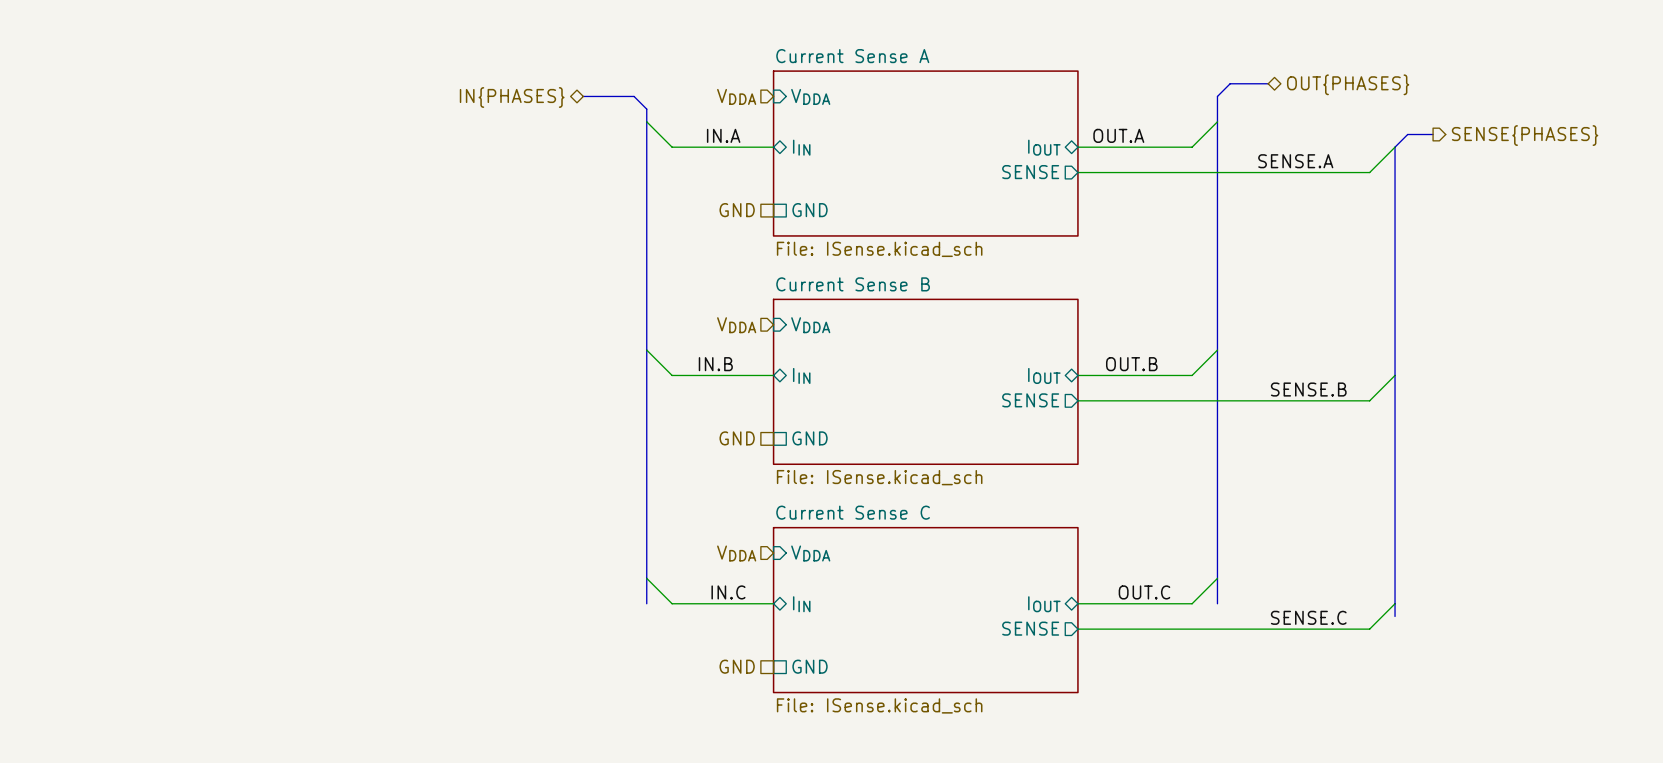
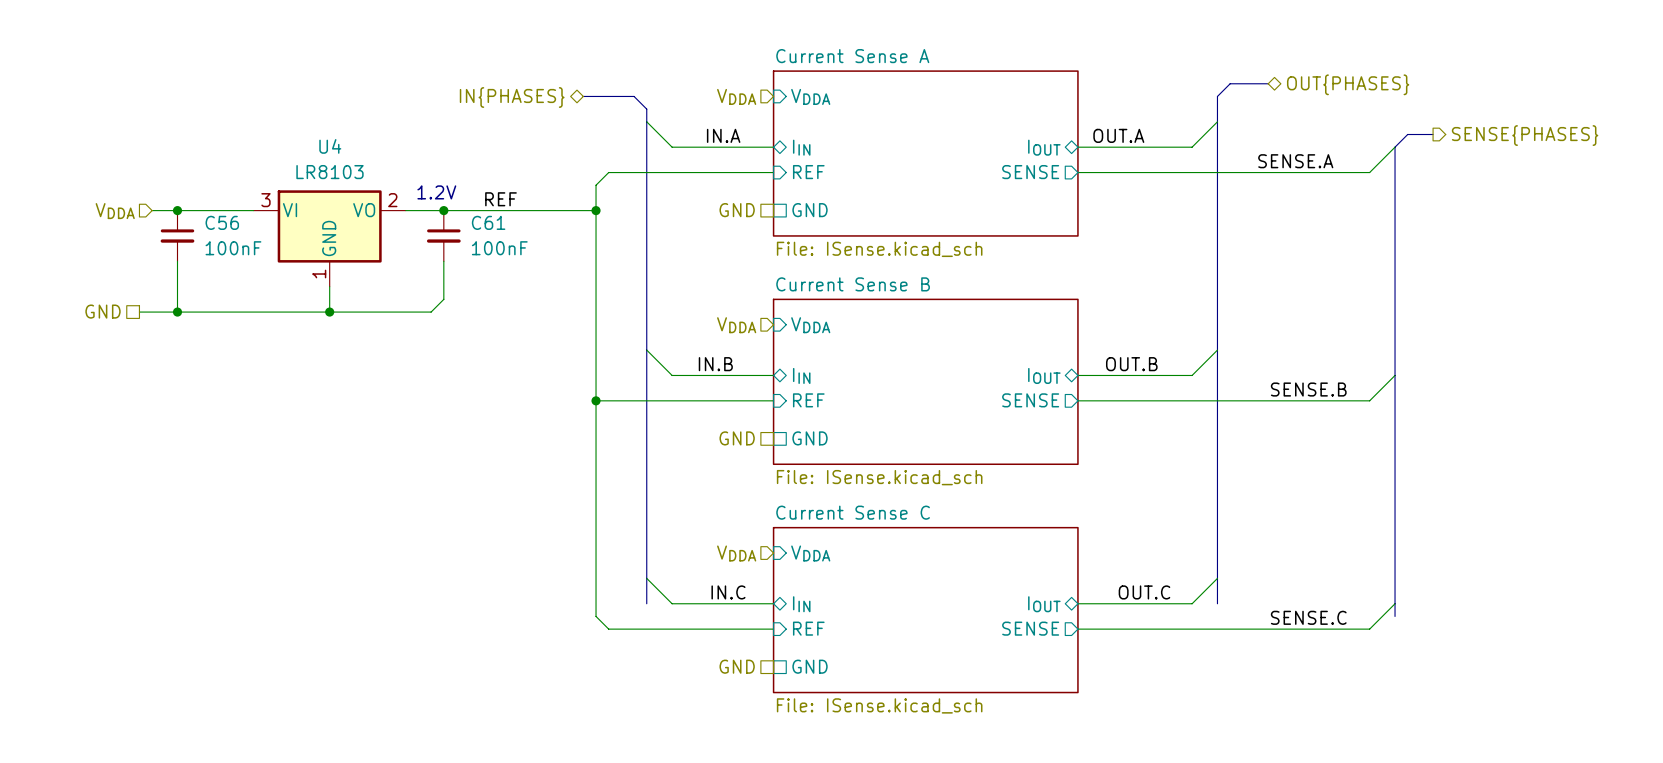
wire: none -> (773, 172) (608, 172) (596, 185) (596, 616) (608, 629) (773, 629)
sheet pin: none -> REF (808, 172)
text: none -> 1.2V (436, 192)
label: none -> REF (500, 199)
wire: none -> (152, 210) (253, 210)
junction: none -> (177, 210)
wire: none -> (405, 210) (596, 210)
junction: none -> (443, 210)
junction: none -> (596, 210)
hierarchical label: none -> VDDA (115, 211)
C56: none -> 100nF (177, 235)
C61: none -> 100nF (443, 235)
U4: none -> LR8103 (329, 238)
wire: none -> (177, 261) (177, 312)
wire: none -> (443, 261) (443, 299) (431, 312) (139, 312)
wire: none -> (329, 286) (329, 312)
hierarchical label: none -> GND (103, 311)
junction: none -> (177, 312)
junction: none -> (329, 312)
wire: none -> (596, 400) (773, 400)
junction: none -> (596, 400)
sheet pin: none -> REF (808, 400)
sheet pin: none -> REF (808, 628)

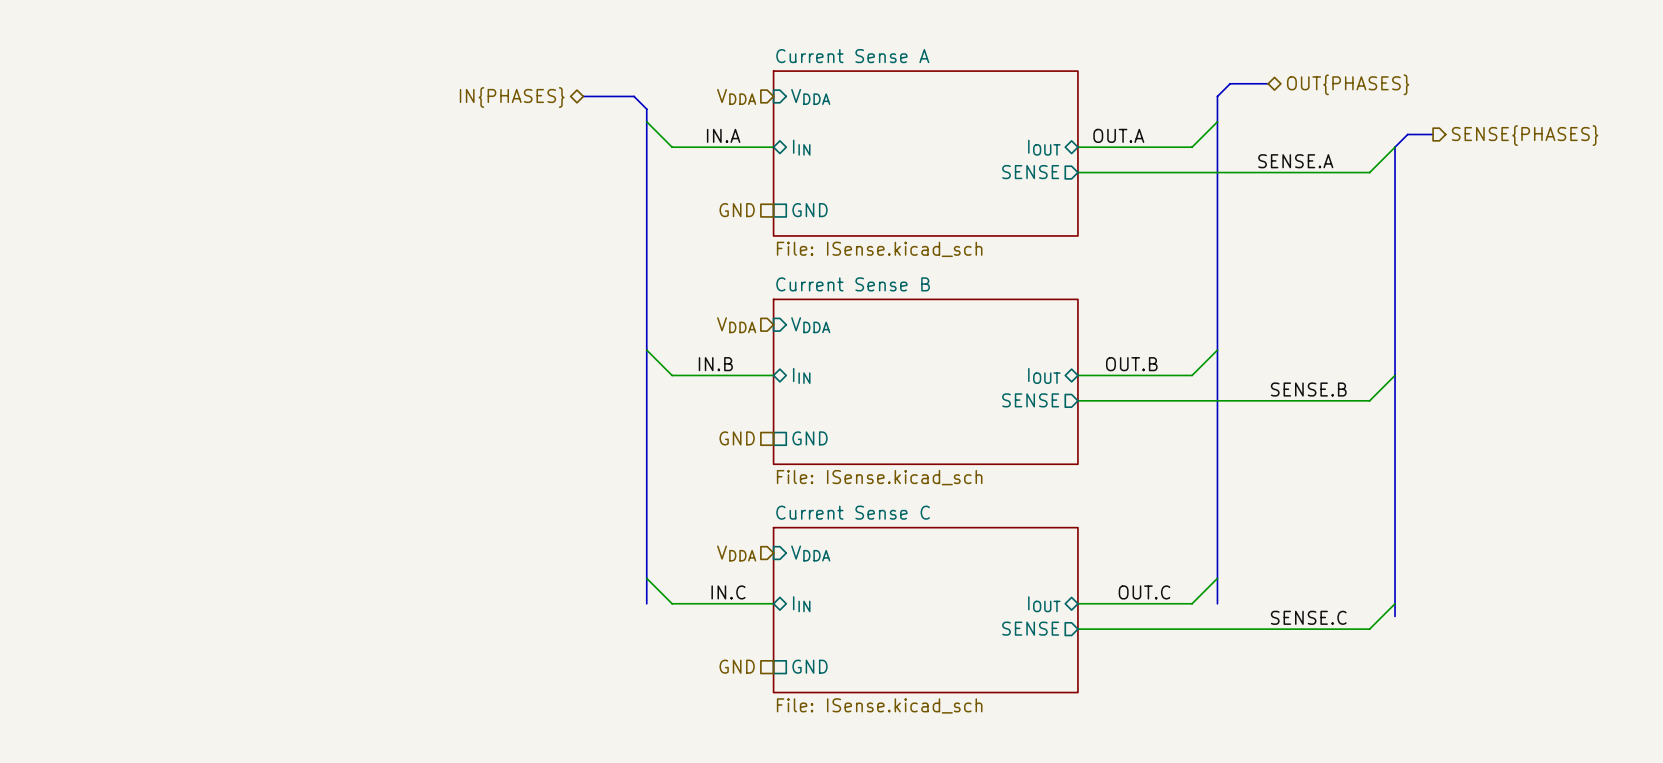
wire: (773, 172) (608, 172) (596, 185) (596, 616) (608, 629) (773, 629) -> none
sheet pin: REF (808, 172) -> none
text: 1.2V (436, 192) -> none
label: REF (500, 199) -> none
wire: (152, 210) (253, 210) -> none
junction: (177, 210) -> none
wire: (405, 210) (596, 210) -> none
junction: (443, 210) -> none
junction: (596, 210) -> none
hierarchical label: VDDA (115, 211) -> none
C56: 100nF (177, 235) -> none
C61: 100nF (443, 235) -> none
U4: LR8103 (329, 238) -> none
wire: (177, 261) (177, 312) -> none
wire: (443, 261) (443, 299) (431, 312) (139, 312) -> none
wire: (329, 286) (329, 312) -> none
hierarchical label: GND (103, 311) -> none
junction: (177, 312) -> none
junction: (329, 312) -> none
wire: (596, 400) (773, 400) -> none
junction: (596, 400) -> none
sheet pin: REF (808, 400) -> none
sheet pin: REF (808, 628) -> none

